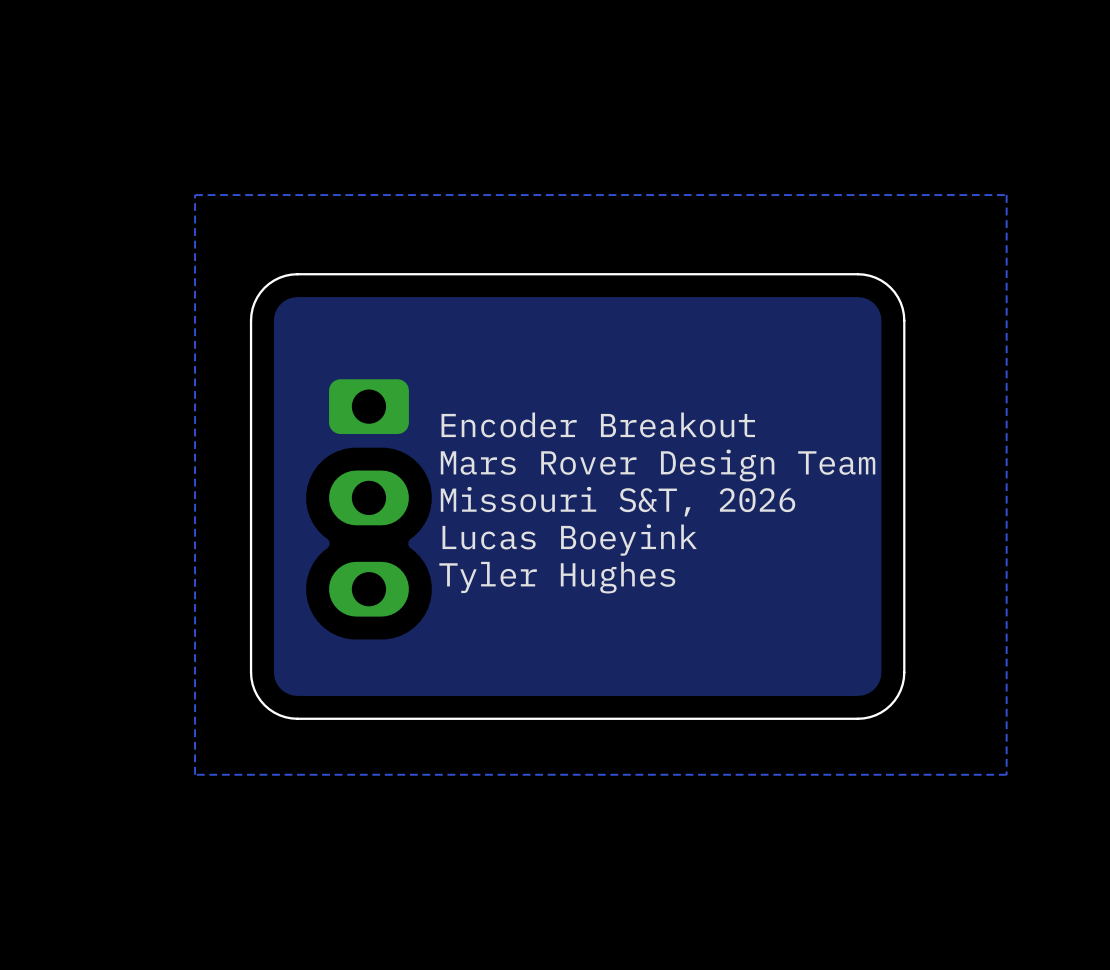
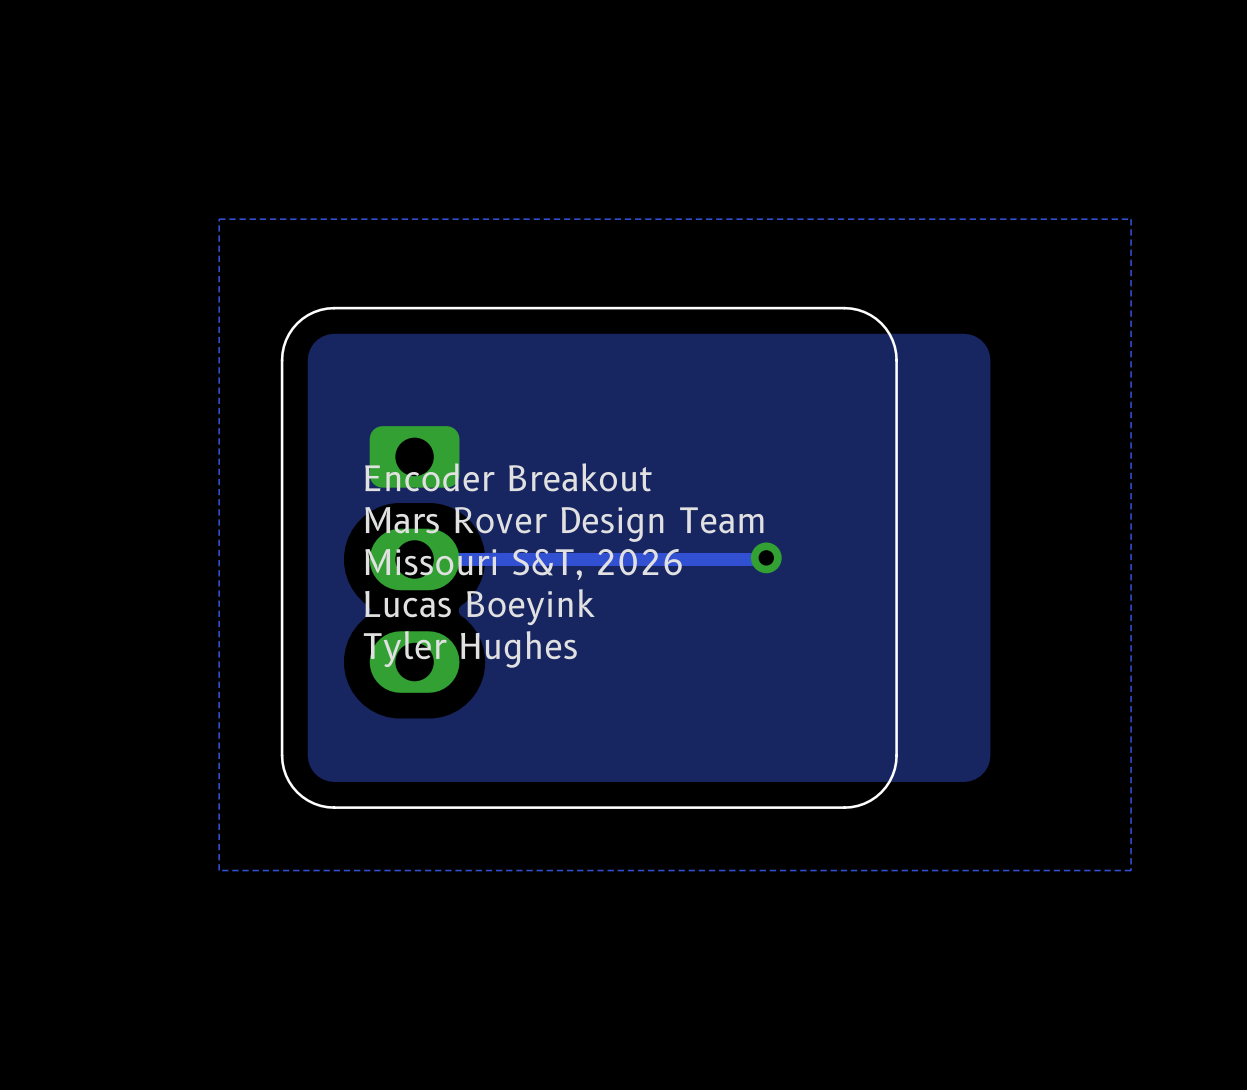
board edge: (751, 274) (869, 275) (881, 280) (894, 292) (900, 302) (904, 320) (904, 672) (900, 690) (894, 700) (886, 709) (875, 715) (863, 718) (751, 718) -> (844, 308) (864, 312) (881, 323) (892, 340) (896, 360) (896, 762) (889, 781) (876, 796) (857, 805) (844, 807)
text position: Encoder Breakout (598, 424) -> Encoder Breakout (508, 477)
text position: Mars Rover Design Team (658, 465) -> Mars Rover Design Team (564, 524)
via: none -> (766, 557)
track: none -> (764, 559) (414, 559)
text position: Missouri S&T, 2026 (618, 501) -> Missouri S&T, 2026 (523, 564)
text position: Lucas Boeyink (569, 539) -> Lucas Boeyink (479, 607)
text position: Tyler Hughes (557, 577) -> Tyler Hughes (470, 649)

